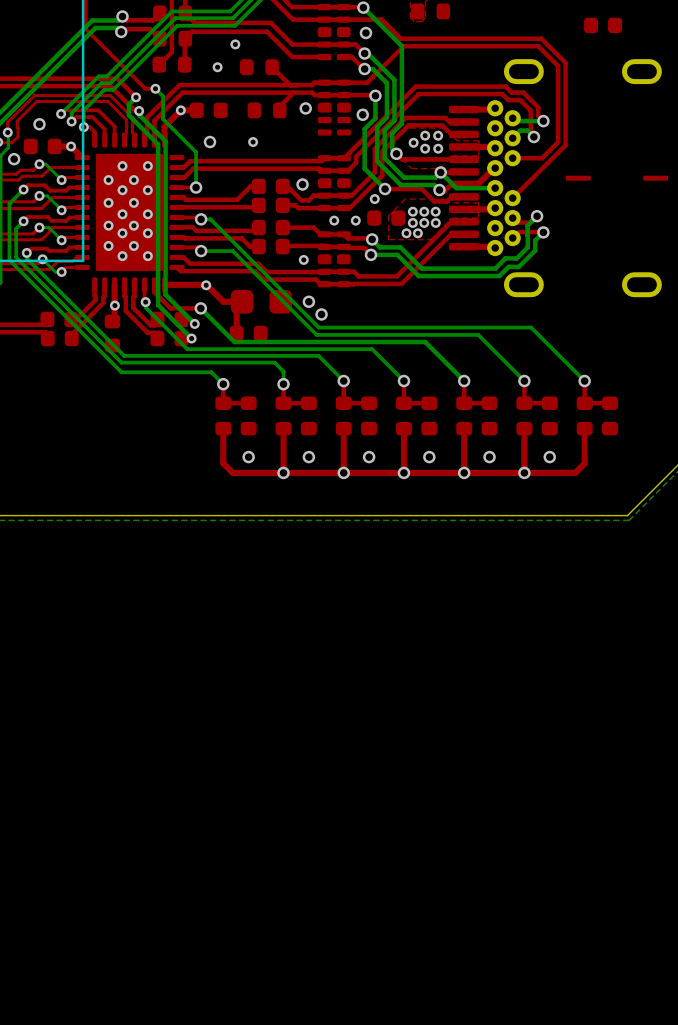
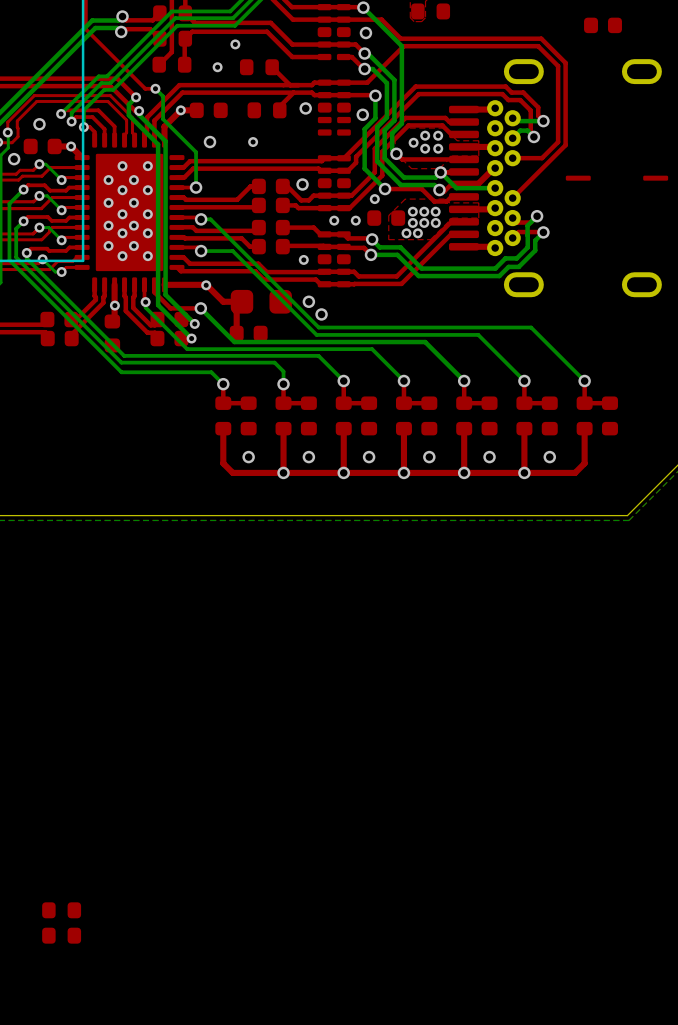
part: none -> (61, 910)
part: none -> (61, 935)

